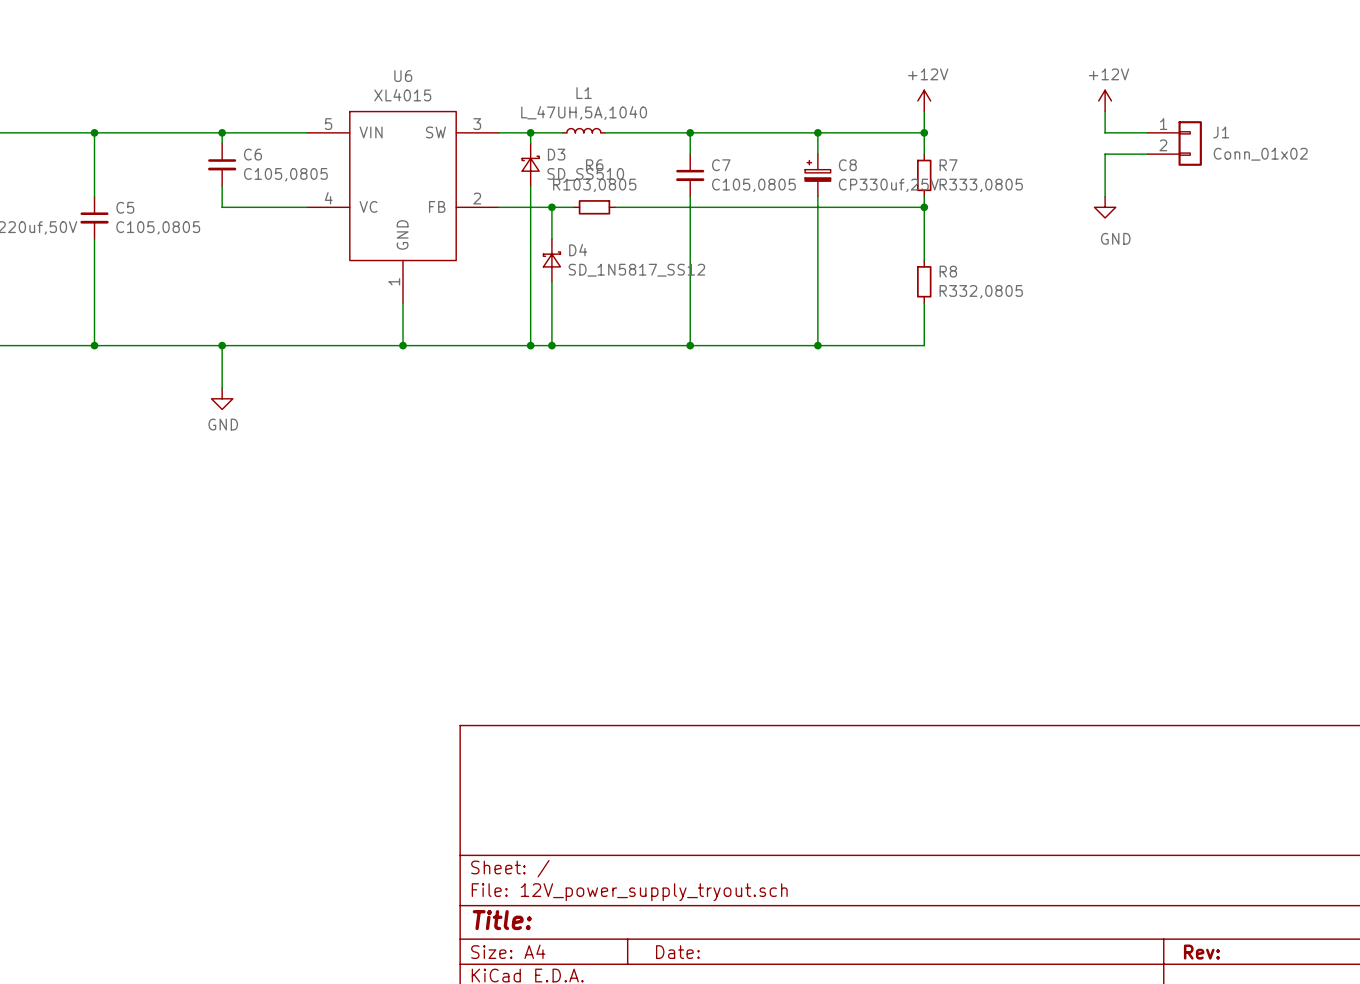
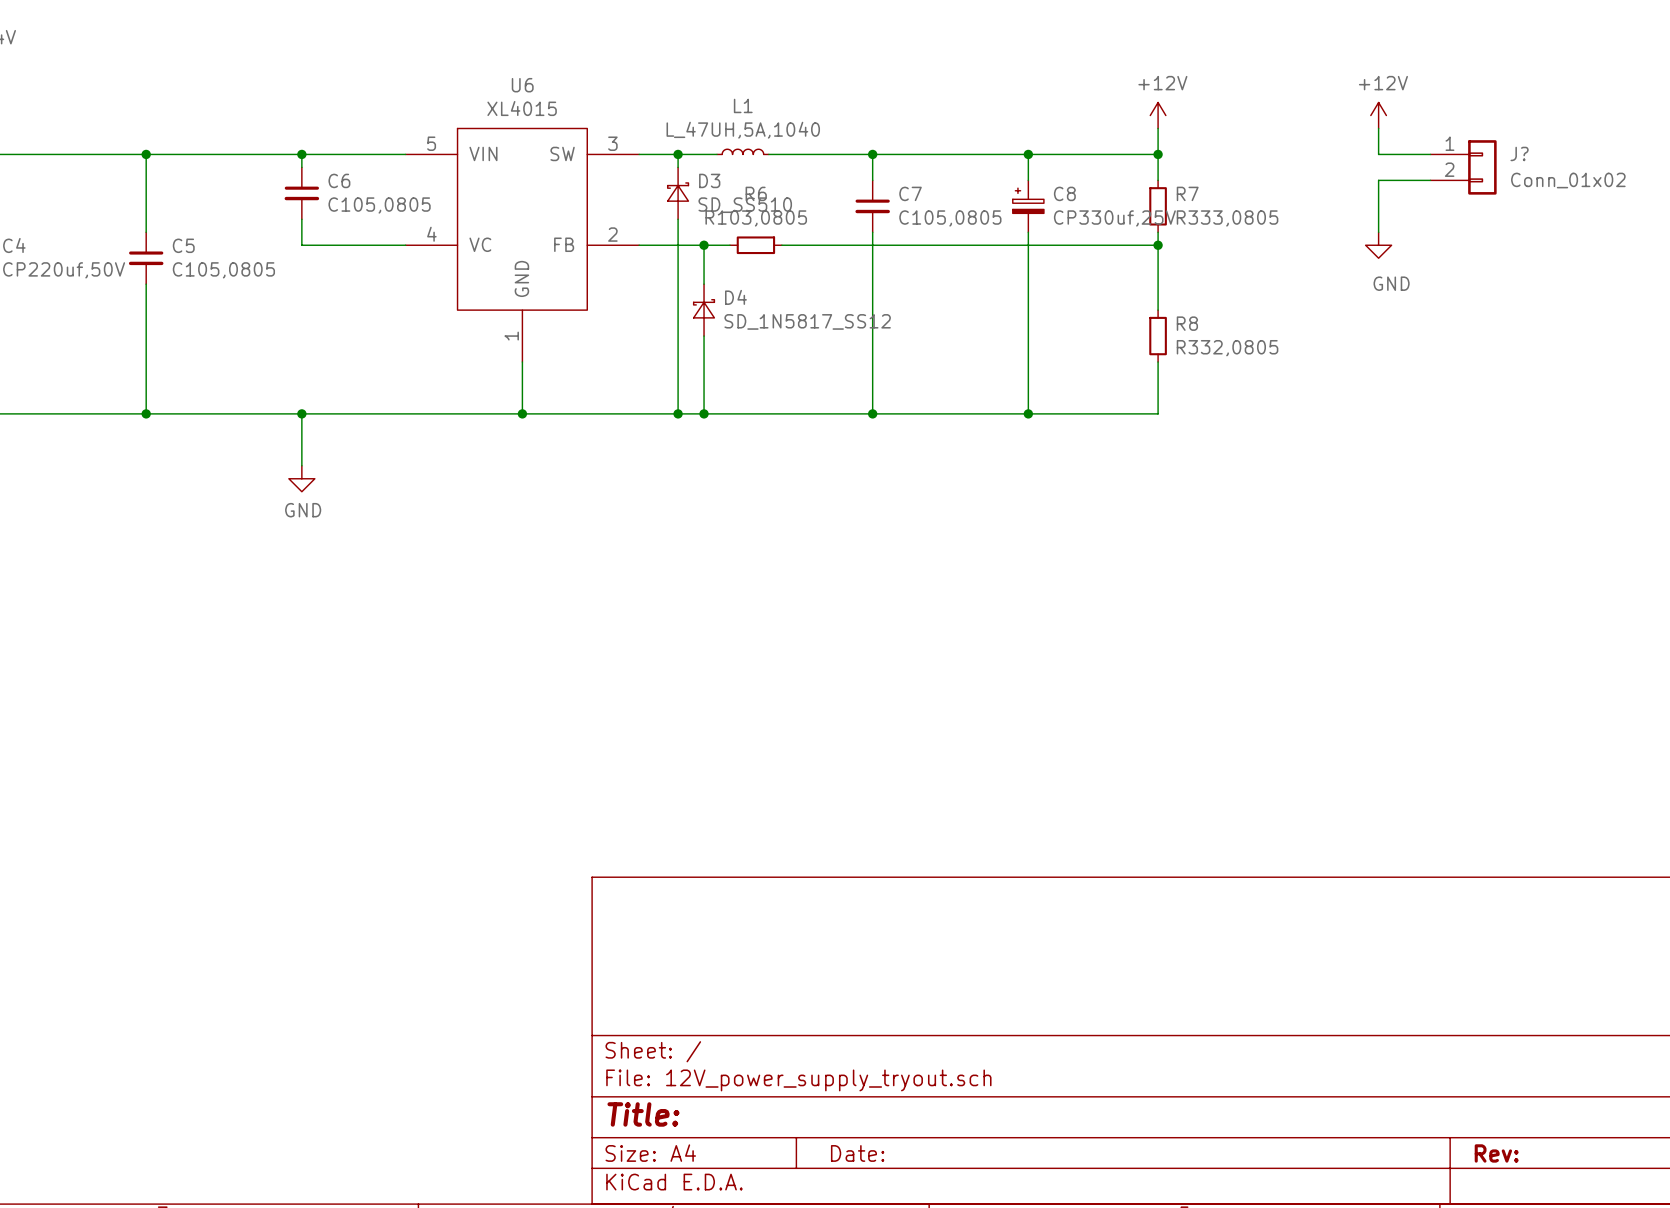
J1 name: J1 (1221, 132) -> J? (1519, 153)

